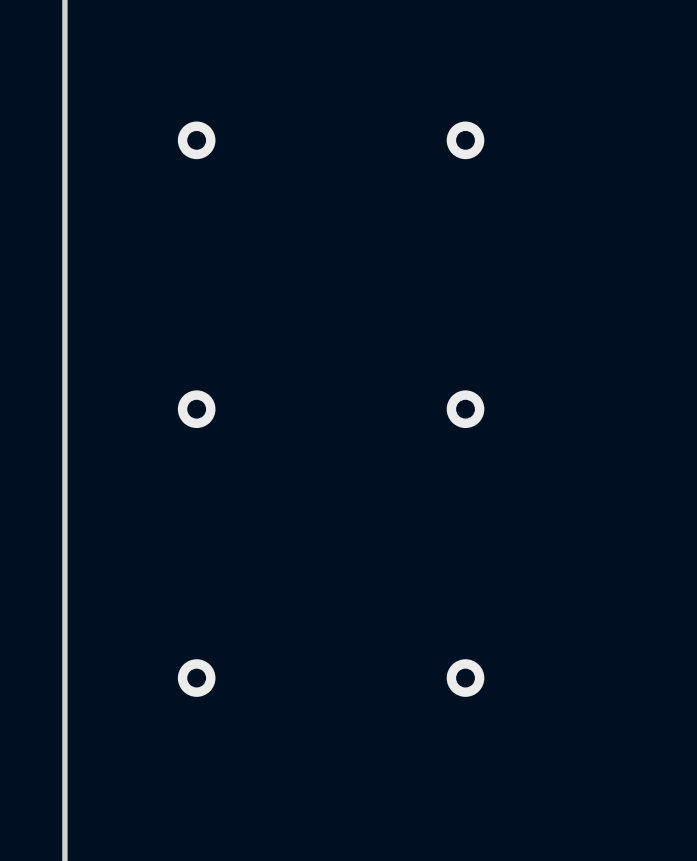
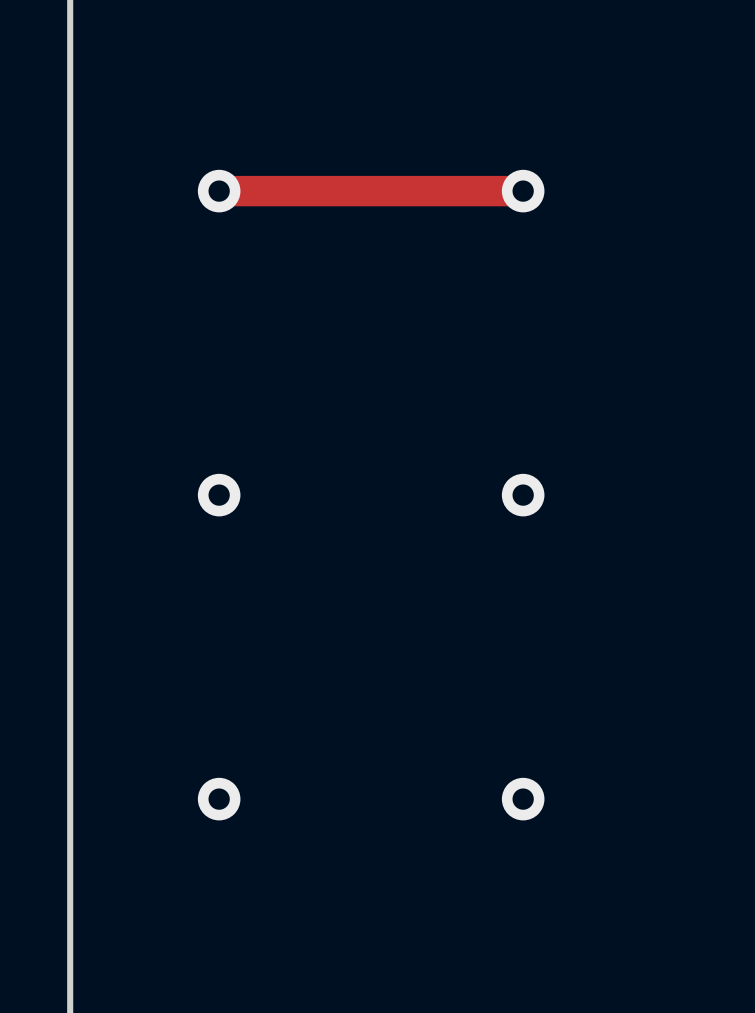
track: none -> (219, 191) (523, 191)

